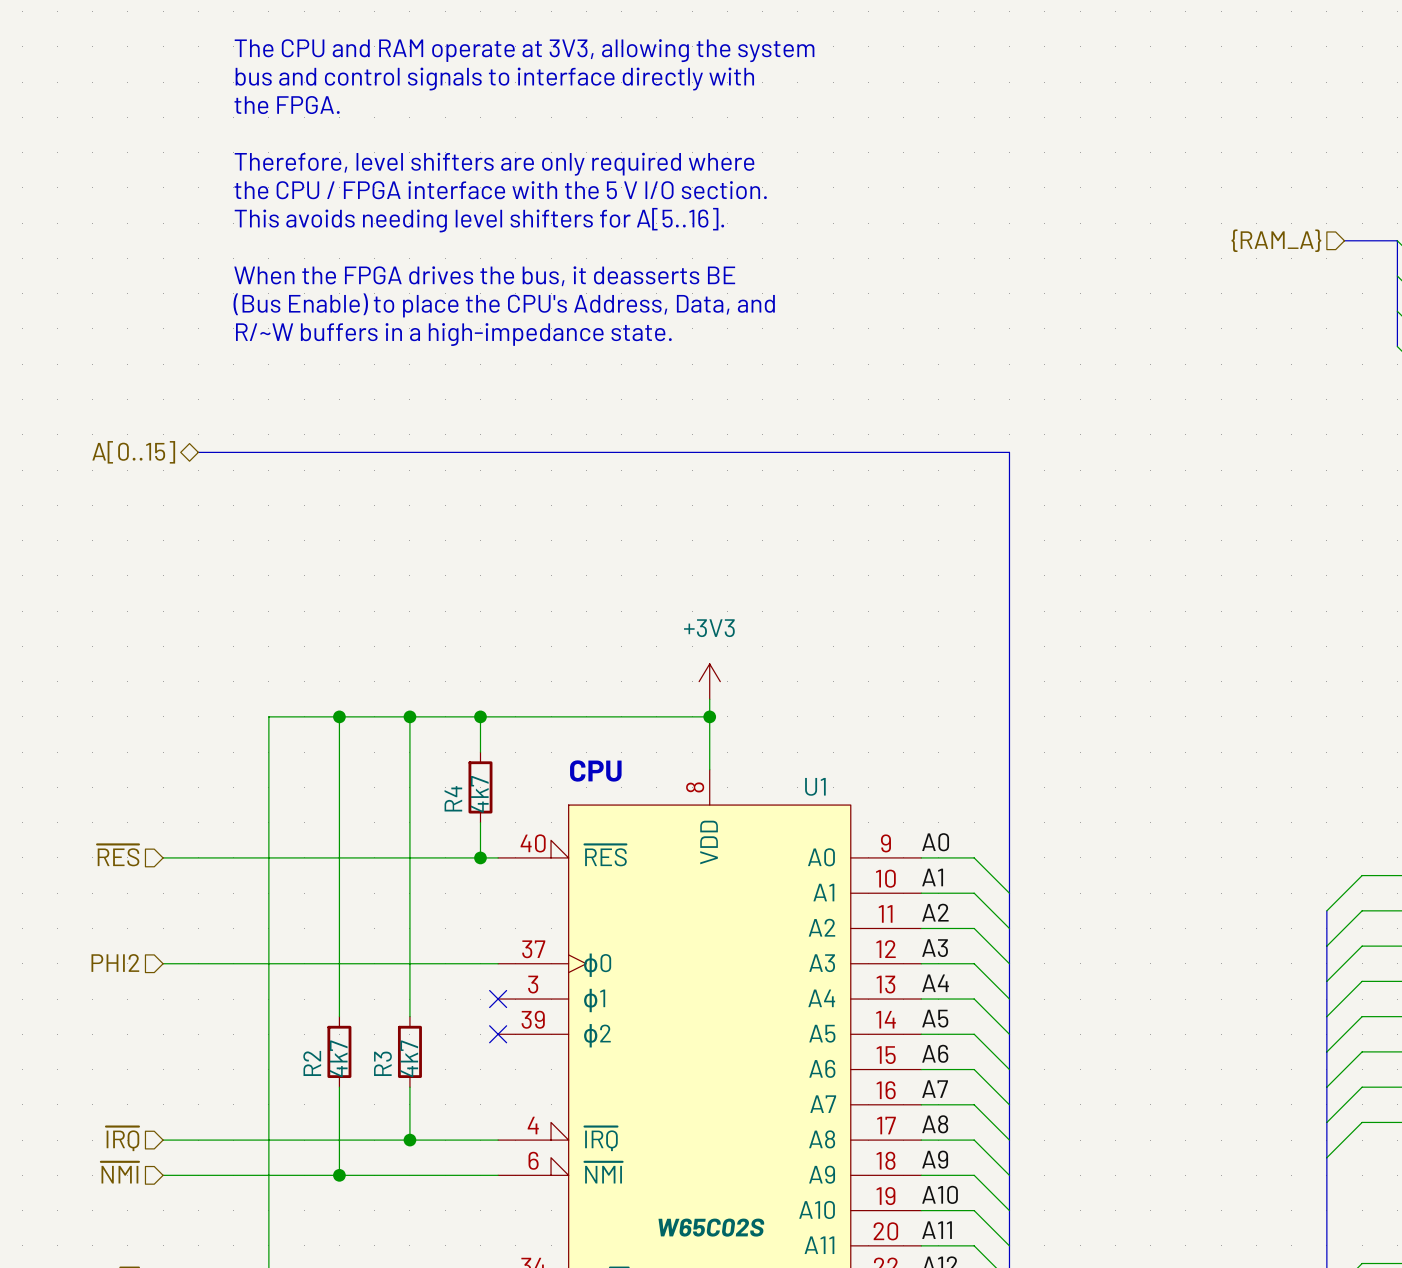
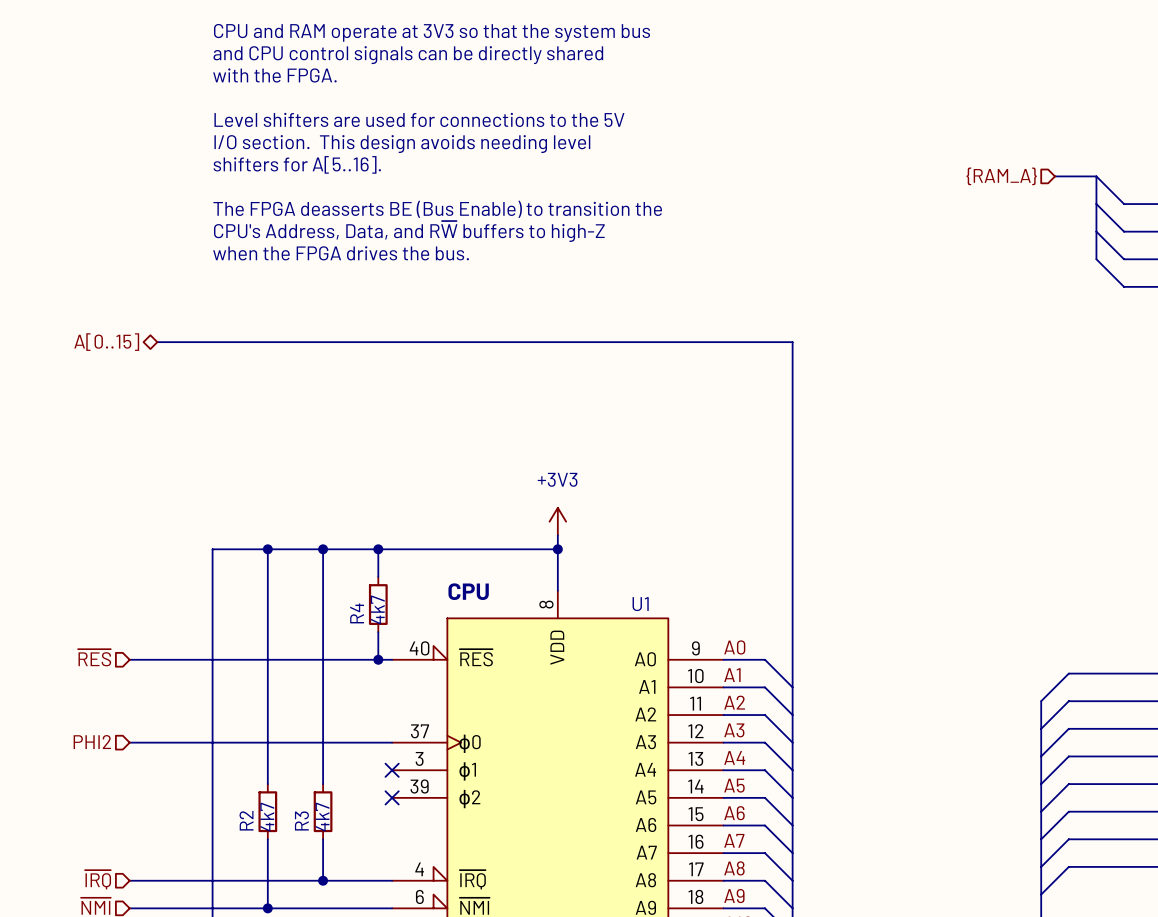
text: The CPU and RAM operate at 3V3, allowing the system (524, 50) -> CPU and RAM operate at 3V3 so that the system bus (432, 32)
text: bus and control signals to interface directly with (494, 79) -> and CPU control signals can be directly shared (408, 55)
text: the FPGA. (287, 105) -> with the FPGA. (274, 75)
text: Therefore, level shifters are only required where (494, 164) -> none
text: none -> Level shifters are used for connections to the 5V (419, 119)
text: the CPU / FPGA interface with the 5 V I/O section. (500, 190) -> none
text: none -> I/O section. This design avoids needing level (402, 144)
text: This avoids needing level shifters for A[5..16]. (479, 220) -> shifters for A[5..16]. (297, 164)
text: When the FPGA drives the bus, it deasserts BE (484, 276) -> none
text: none -> The FPGA deasserts BE (Bus Enable) to transition the (437, 209)
text: (Bus Enable) to place the CPU's Address, Data, and (504, 305) -> none
text: none -> CPU's Address, Data, and R~{W} buffers to high-Z (409, 231)
text: R/~W buffers in a high-impedance state. (453, 334) -> none
text: none -> when the FPGA drives the bus. (341, 253)

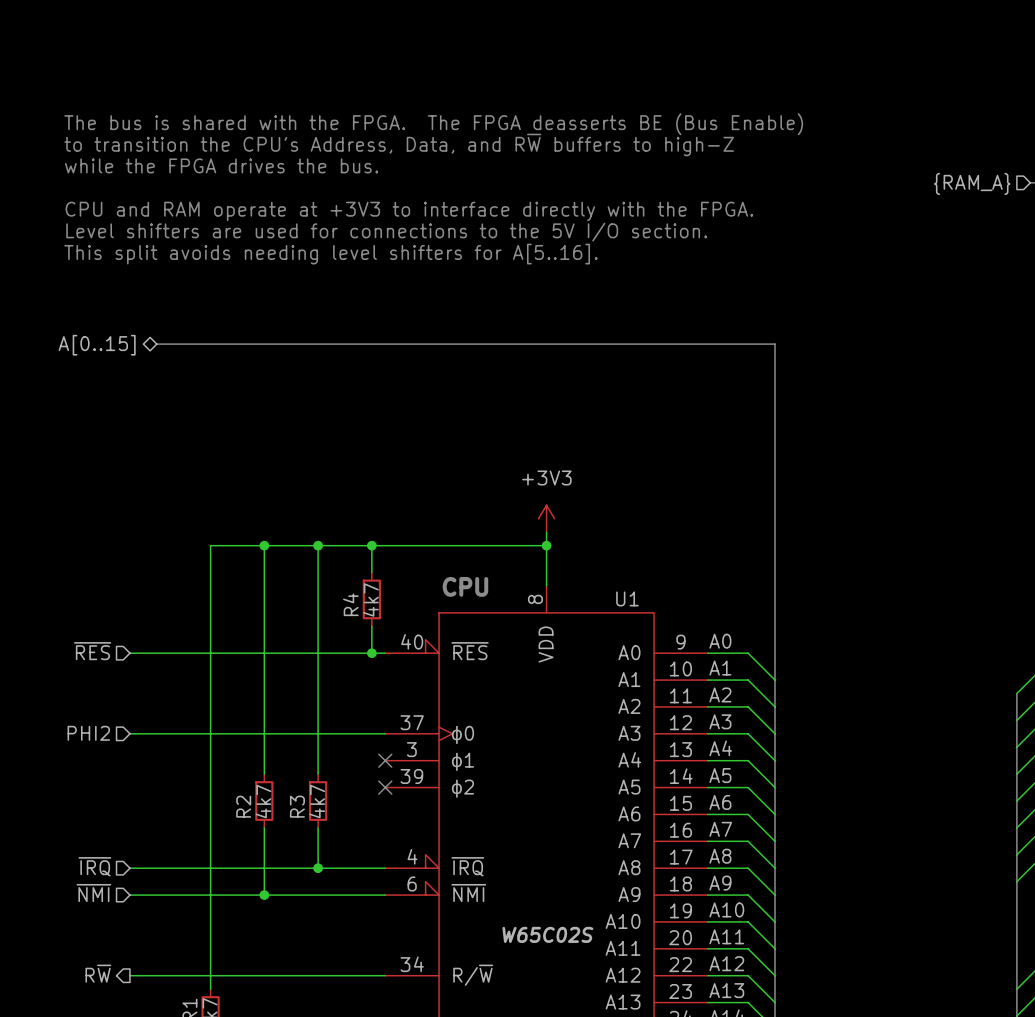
text: CPU and RAM operate at 3V3 so that the system bus (432, 32) -> none
text: and CPU control signals can be directly shared (408, 55) -> none
text: with the FPGA. (274, 75) -> none
text: none -> The bus is shared with the FPGA. The FPGA deasserts BE (Bus Enable) (433, 124)
text: Level shifters are used for connections to the 5V (419, 119) -> none
text: none -> to transition the CPU's Address, Data, and R~{W} buffers to high-Z (399, 144)
text: I/O section. This design avoids needing level (402, 144) -> none
text: none -> while the FPGA drives the bus. (221, 165)
text: shifters for A[5..16]. (297, 164) -> none
text: none -> CPU and RAM operate at +3V3 to interface directly with the FPGA. (409, 211)
text: The FPGA deasserts BE (Bus Enable) to transition the (437, 209) -> none
text: none -> Level shifters are used for connections to the 5V I/O section. (386, 232)
text: CPU's Address, Data, and R~{W} buffers to high-Z (409, 231) -> none
text: none -> This split avoids needing level shifters for A[5..16]. (331, 254)
text: when the FPGA drives the bus. (341, 253) -> none

